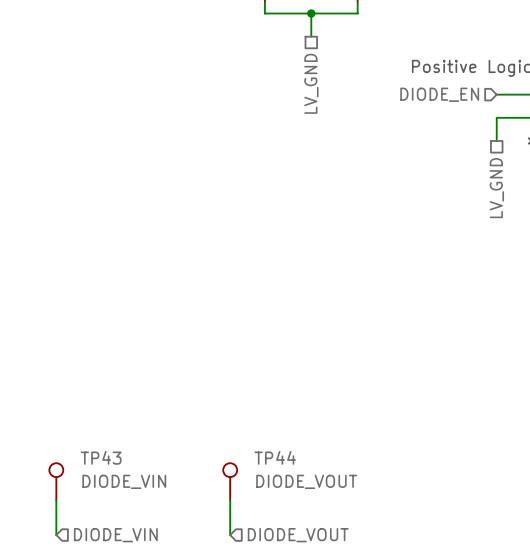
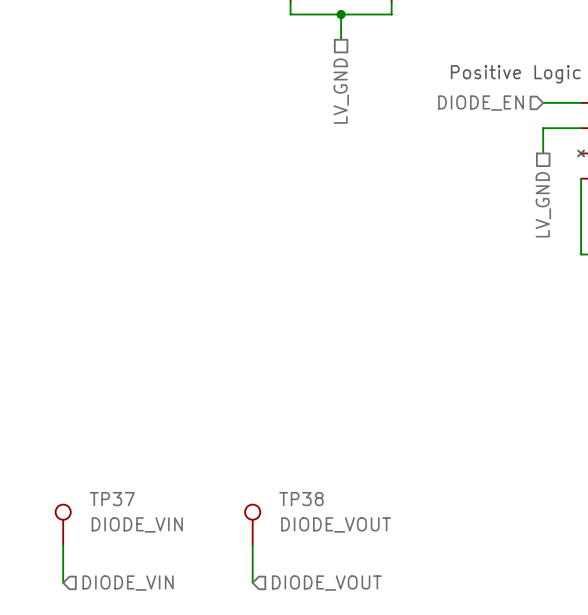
TP43 name: TP43 (101, 457) -> TP37 (112, 499)
TP44 name: TP44 (275, 457) -> TP38 (301, 499)

